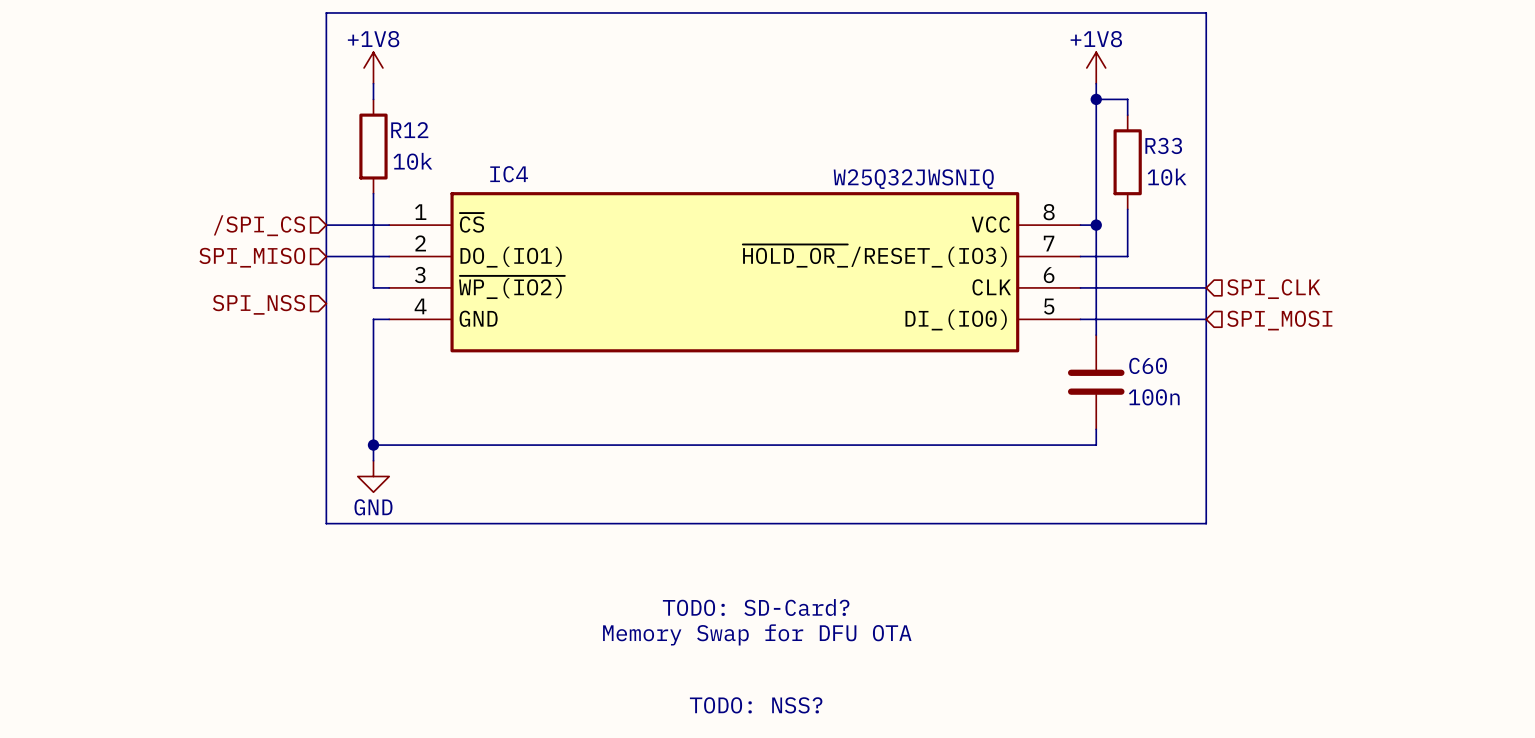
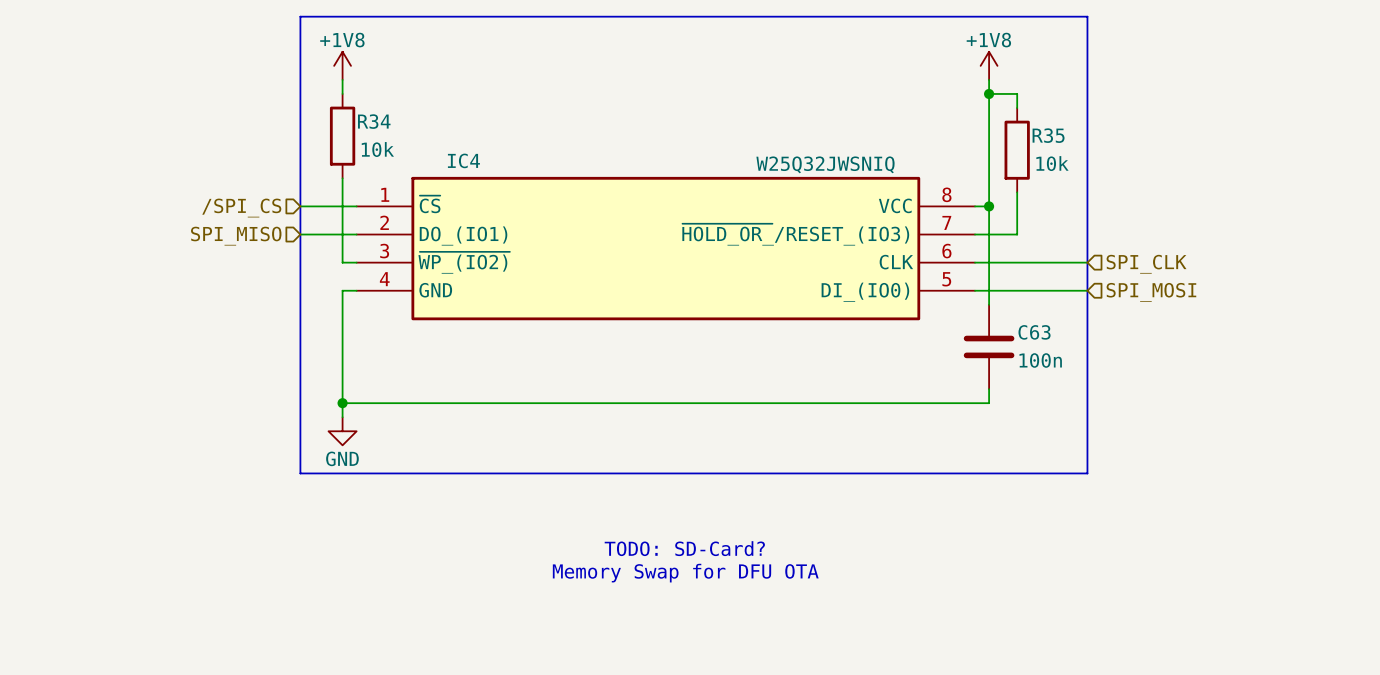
R12 name: R12 (409, 130) -> R34 (374, 121)
R33 name: R33 (1163, 145) -> R35 (1048, 135)
hierarchical label: SPI_NSS (258, 304) -> none
C60 name: C60 (1148, 365) -> C63 (1034, 332)
text: TODO: NSS? (756, 705) -> none

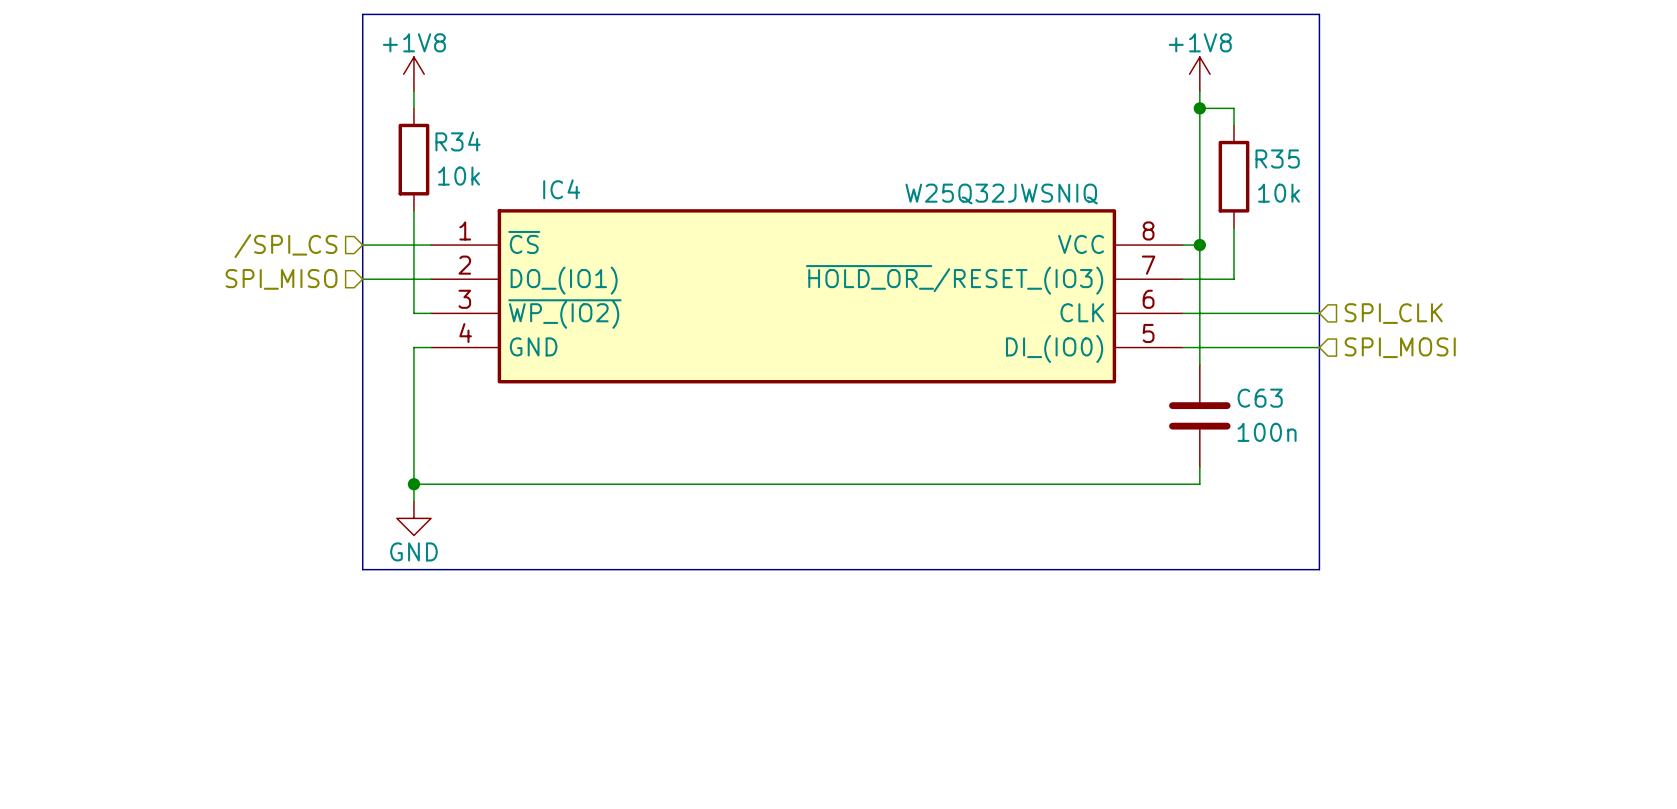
text: TODO: SD-Card? (684, 548) -> none
text: Memory Swap for DFU OTA (685, 573) -> none

